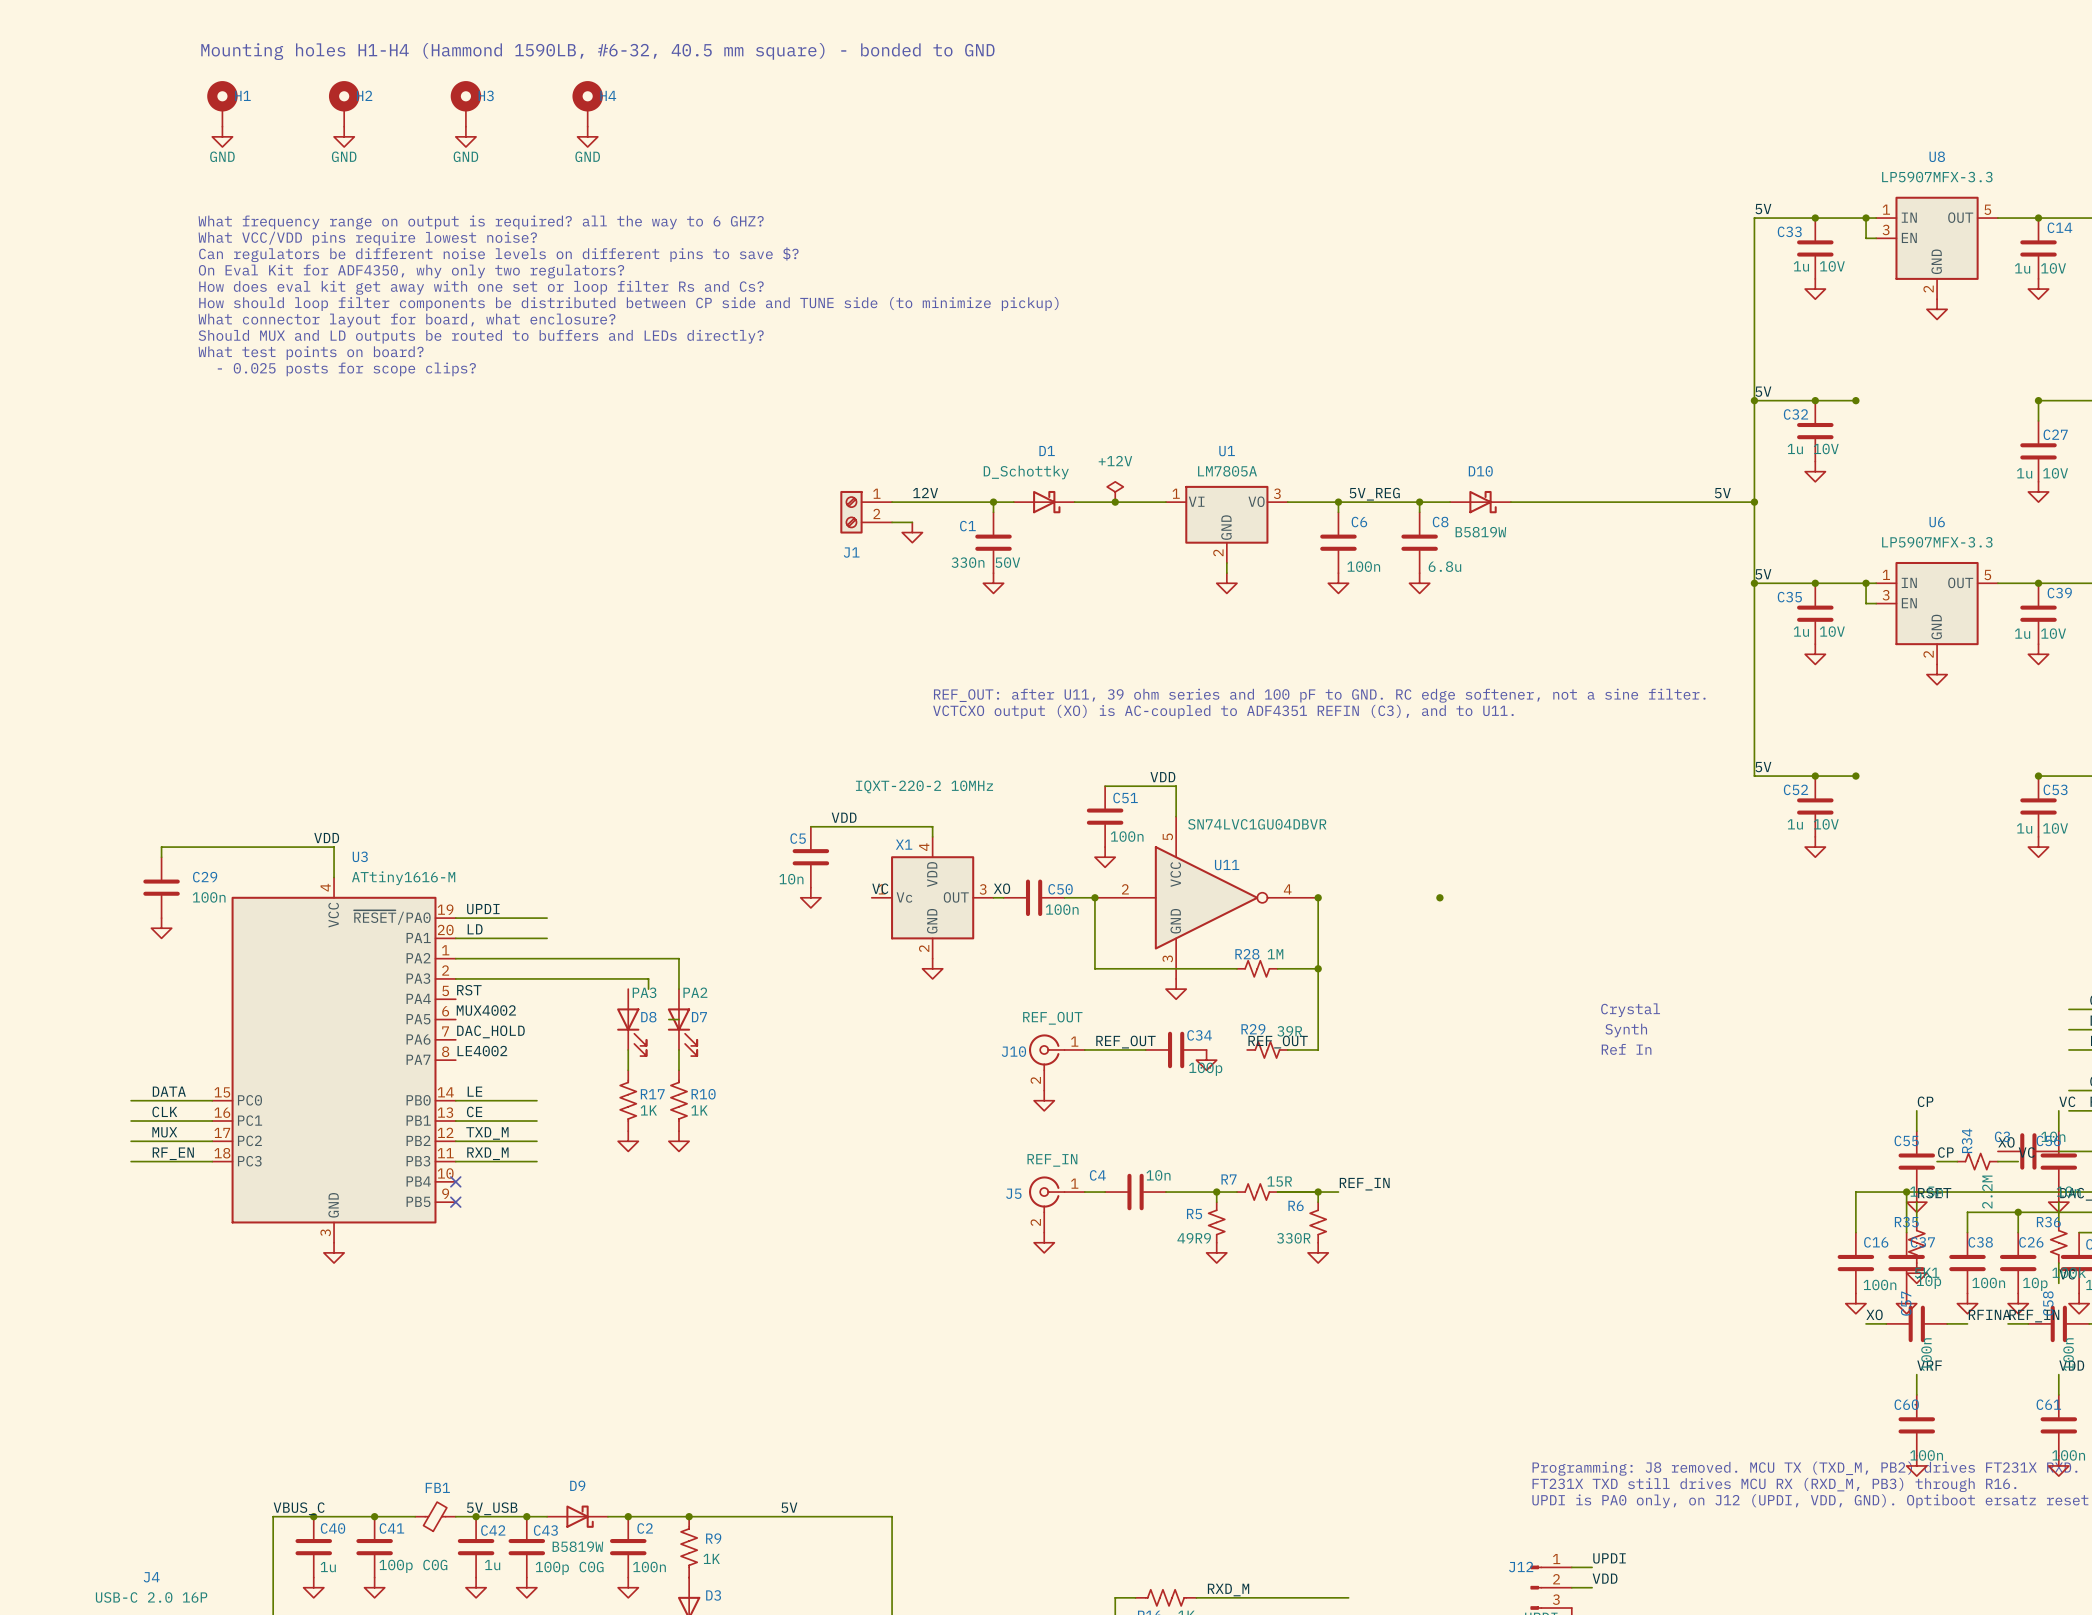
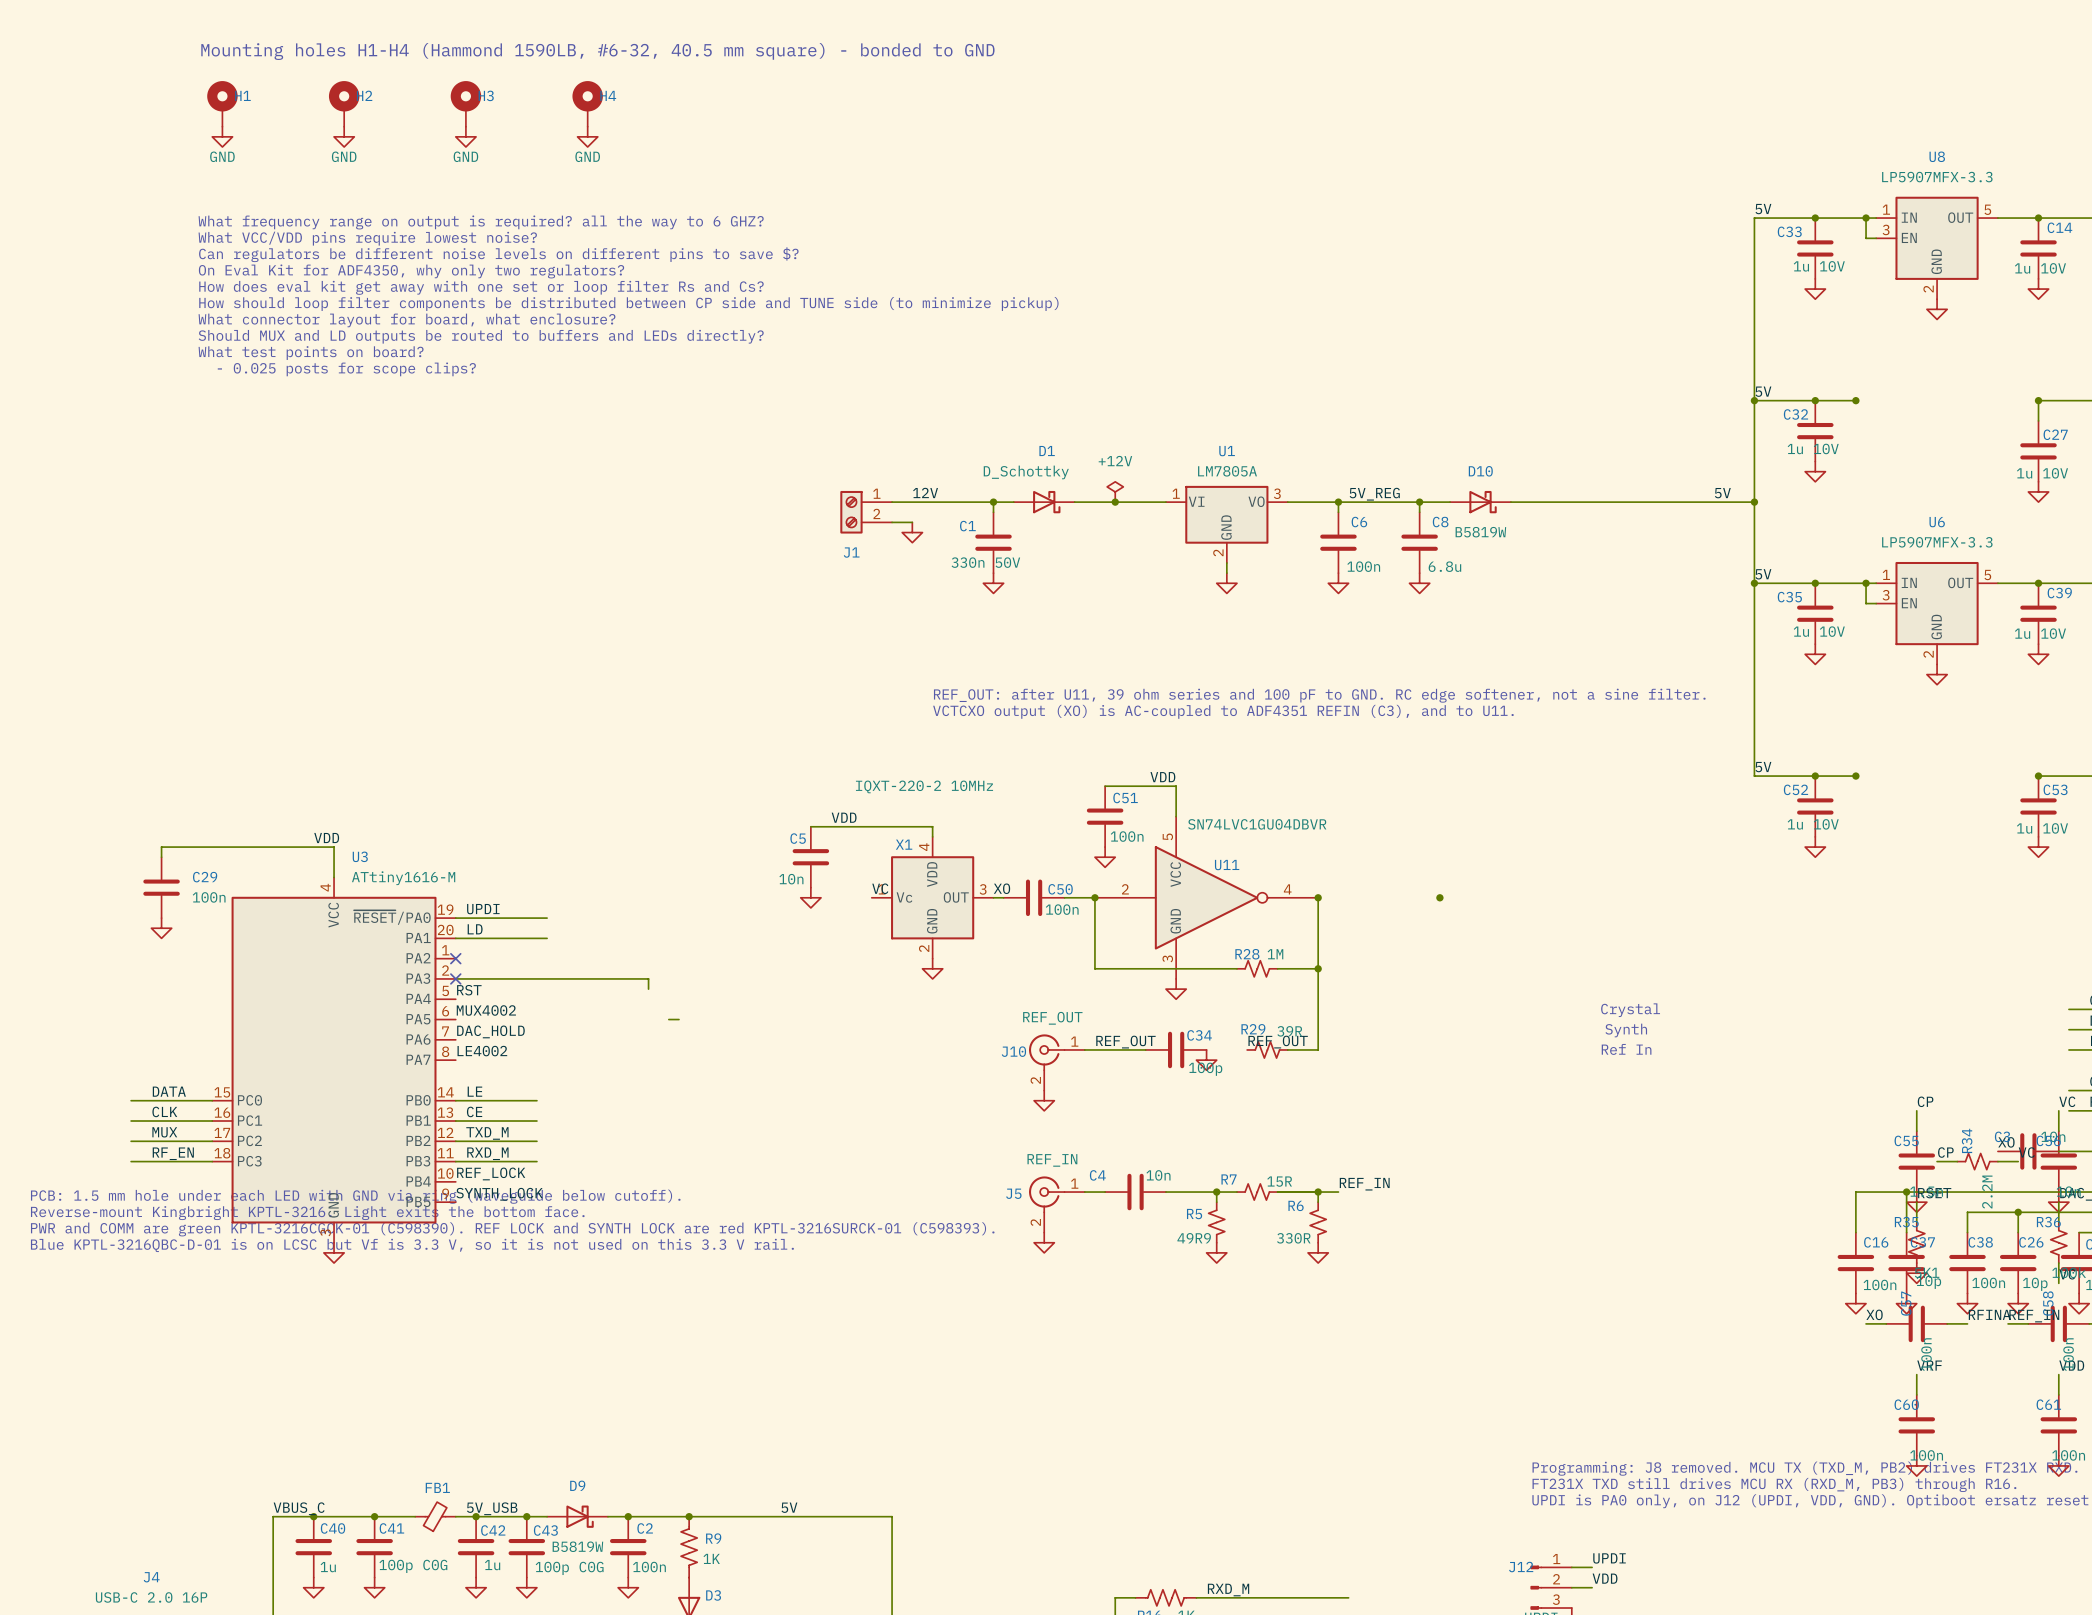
wire: (455, 958) (678, 958) (678, 989) -> none
no-connect mark: none -> (455, 958)
no-connect mark: none -> (455, 978)
D8: PA3 (631, 1022) -> none
D7: PA2 (682, 1022) -> none
wire: (628, 1049) (628, 1070) -> none
wire: (678, 1049) (678, 1070) -> none
R17: 1K (628, 1100) -> none
R10: 1K (678, 1100) -> none
power symbol: (628, 1141) -> none
power symbol: (678, 1141) -> none
label: none -> REF_LOCK (491, 1173)
no-connect mark: (455, 1181) -> none
label: none -> SYNTH_LOCK (499, 1194)
text: none -> PCB: 1.5 mm hole under each LED with GND via ring (waveguide below cutoff). (355, 1196)
no-connect mark: (455, 1202) -> none
text: none -> Reverse-mount Kingbright KPTL-3216. Light exits the bottom face. (307, 1213)
text: none -> PWR and COMM are green KPTL-3216CGCK-01 (C598390). REF LOCK and SYNTH LOCK are red KPTL-3216SURCK-01 (C598393). (512, 1229)
text: none -> Blue KPTL-3216QBC-D-01 is on LCSC but Vf is 3.3 V, so it is not used on this 3.3 V rail. (412, 1245)

